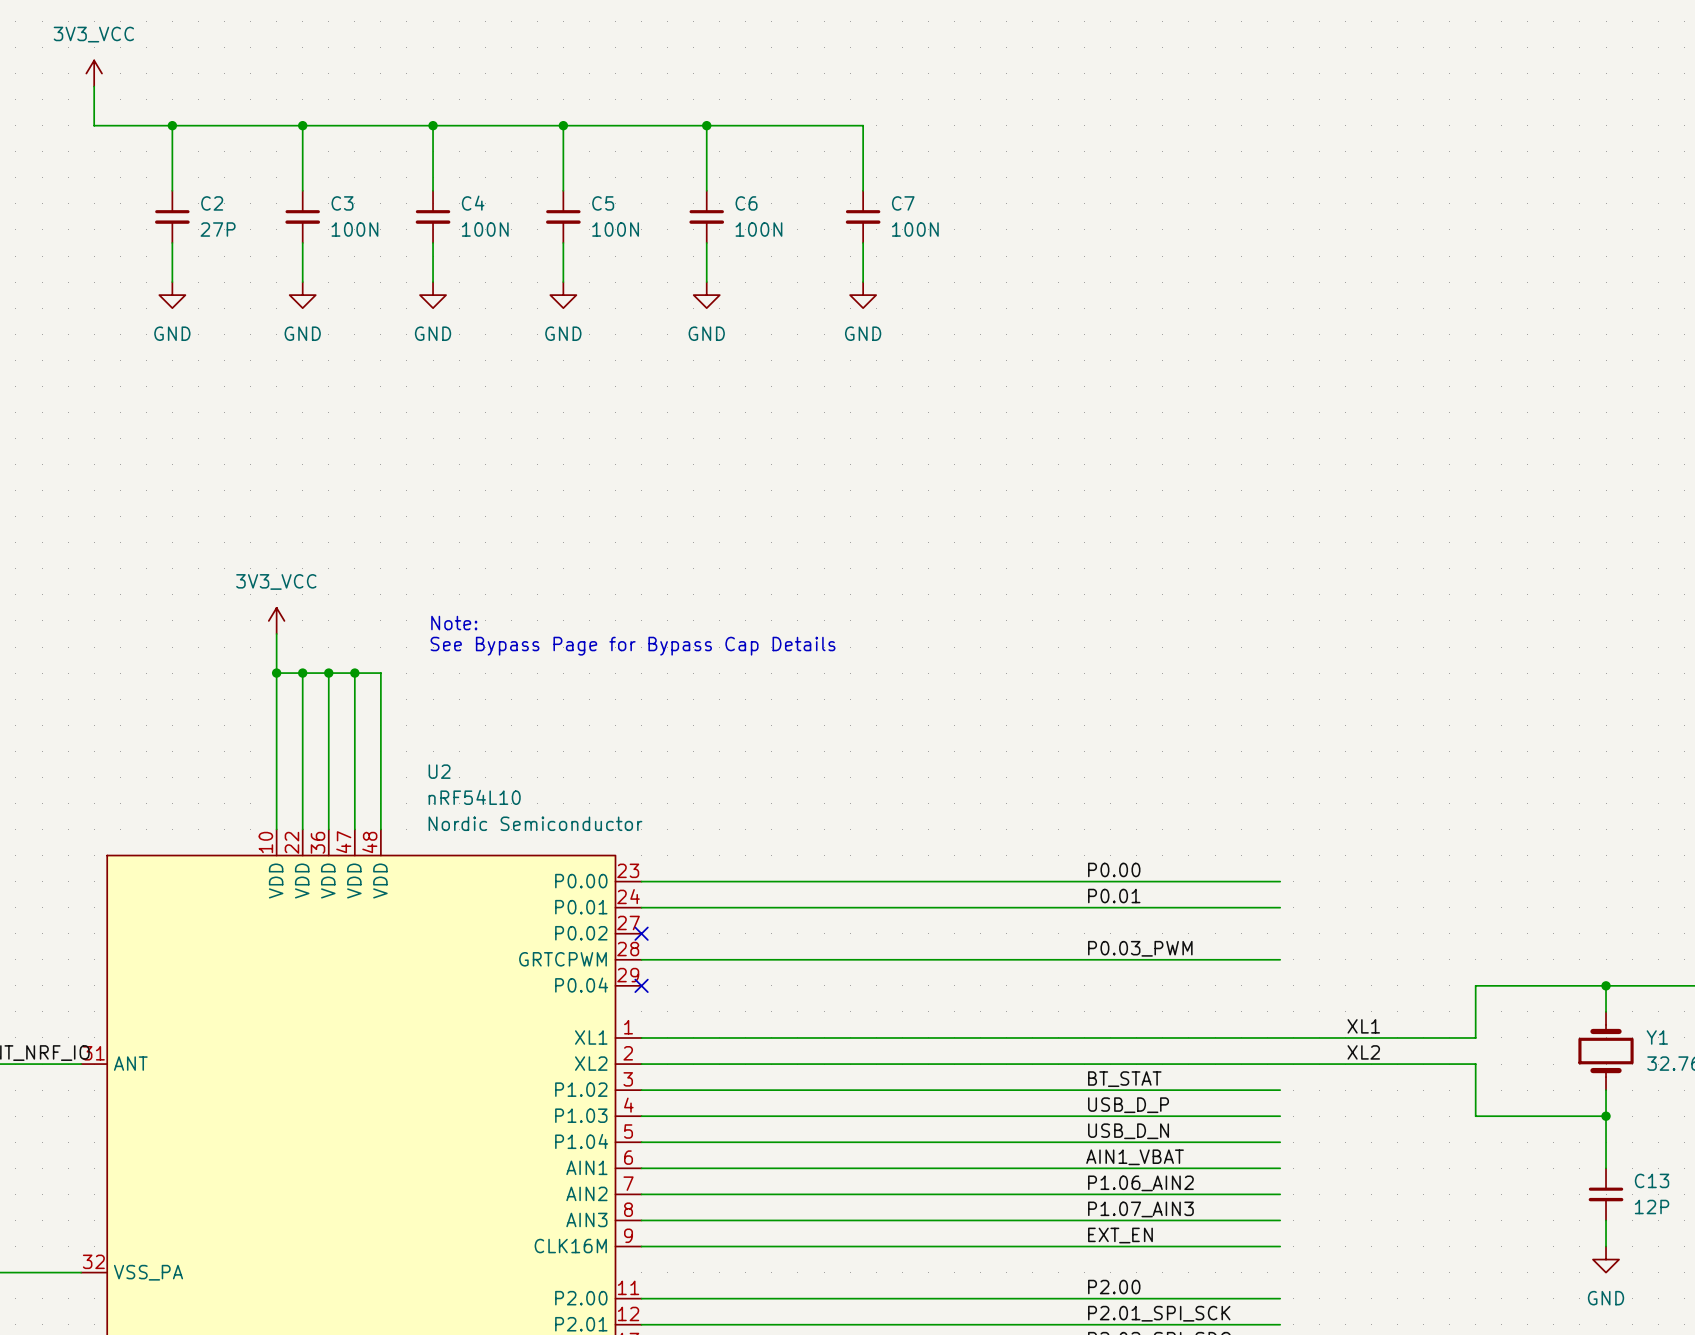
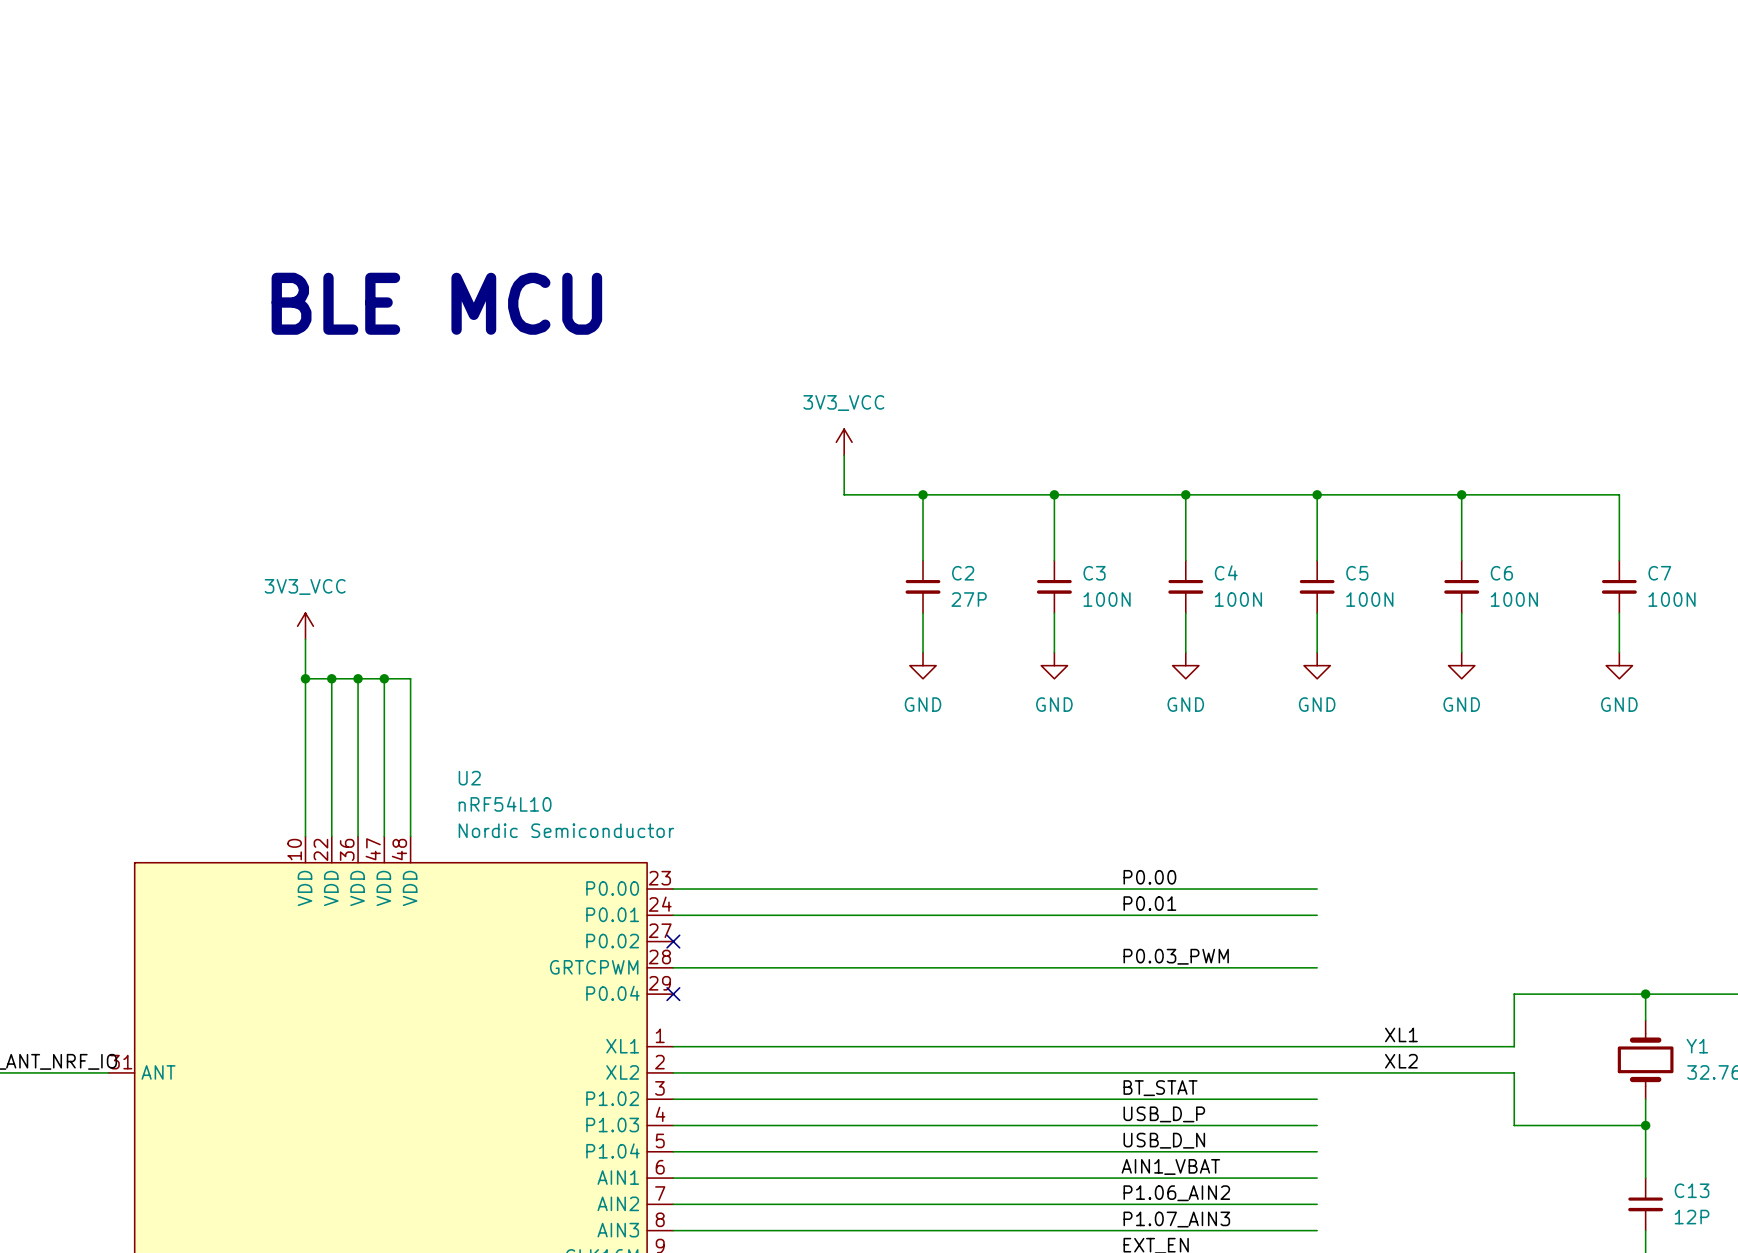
power symbol: 3V3_VCC (94, 73) -> none
wire: (94, 86) (94, 125) (863, 125) (863, 190) -> none
wire: (172, 125) (172, 190) -> none
junction: (172, 125) -> none
wire: (302, 125) (302, 190) -> none
junction: (302, 125) -> none
wire: (433, 125) (433, 190) -> none
junction: (433, 125) -> none
wire: (563, 125) (563, 190) -> none
junction: (563, 125) -> none
wire: (706, 125) (706, 190) -> none
junction: (706, 125) -> none
C2 position: (172, 216) -> (923, 586)
C3 position: (302, 216) -> (1054, 586)
C4 position: (433, 216) -> (1185, 586)
C5 position: (563, 216) -> (1317, 586)
C6 position: (706, 216) -> (1461, 586)
C7 position: (863, 216) -> (1619, 586)
wire: (172, 242) (172, 282) -> none
wire: (302, 242) (302, 282) -> none
wire: (433, 242) (433, 282) -> none
wire: (563, 242) (563, 282) -> none
wire: (706, 242) (706, 282) -> none
wire: (863, 242) (863, 282) -> none
power symbol: GND (172, 295) -> none
power symbol: GND (302, 295) -> none
power symbol: GND (433, 295) -> none
power symbol: GND (563, 295) -> none
power symbol: GND (706, 295) -> none
power symbol: GND (863, 295) -> none
text: none -> BLE MCU (436, 303)
power symbol: none -> 3V3_VCC (844, 442)
wire: none -> (844, 455) (844, 494) (1619, 494) (1619, 560)
wire: none -> (923, 494) (923, 560)
junction: none -> (923, 494)
wire: none -> (1054, 494) (1054, 560)
junction: none -> (1054, 494)
wire: none -> (1185, 494) (1185, 560)
junction: none -> (1185, 494)
wire: none -> (1317, 494) (1317, 560)
junction: none -> (1317, 494)
wire: none -> (1461, 494) (1461, 560)
junction: none -> (1461, 494)
wire: none -> (923, 613) (923, 652)
wire: none -> (1054, 613) (1054, 652)
wire: none -> (1185, 613) (1185, 652)
wire: none -> (1317, 613) (1317, 652)
wire: none -> (1461, 613) (1461, 652)
wire: none -> (1619, 613) (1619, 652)
text: Note: (454, 623) -> none
text: See Bypass Page for Bypass Cap Details (633, 646) -> none
power symbol: none -> GND (923, 665)
power symbol: none -> GND (1054, 665)
power symbol: none -> GND (1185, 665)
power symbol: none -> GND (1317, 665)
power symbol: none -> GND (1461, 665)
power symbol: none -> GND (1619, 665)

